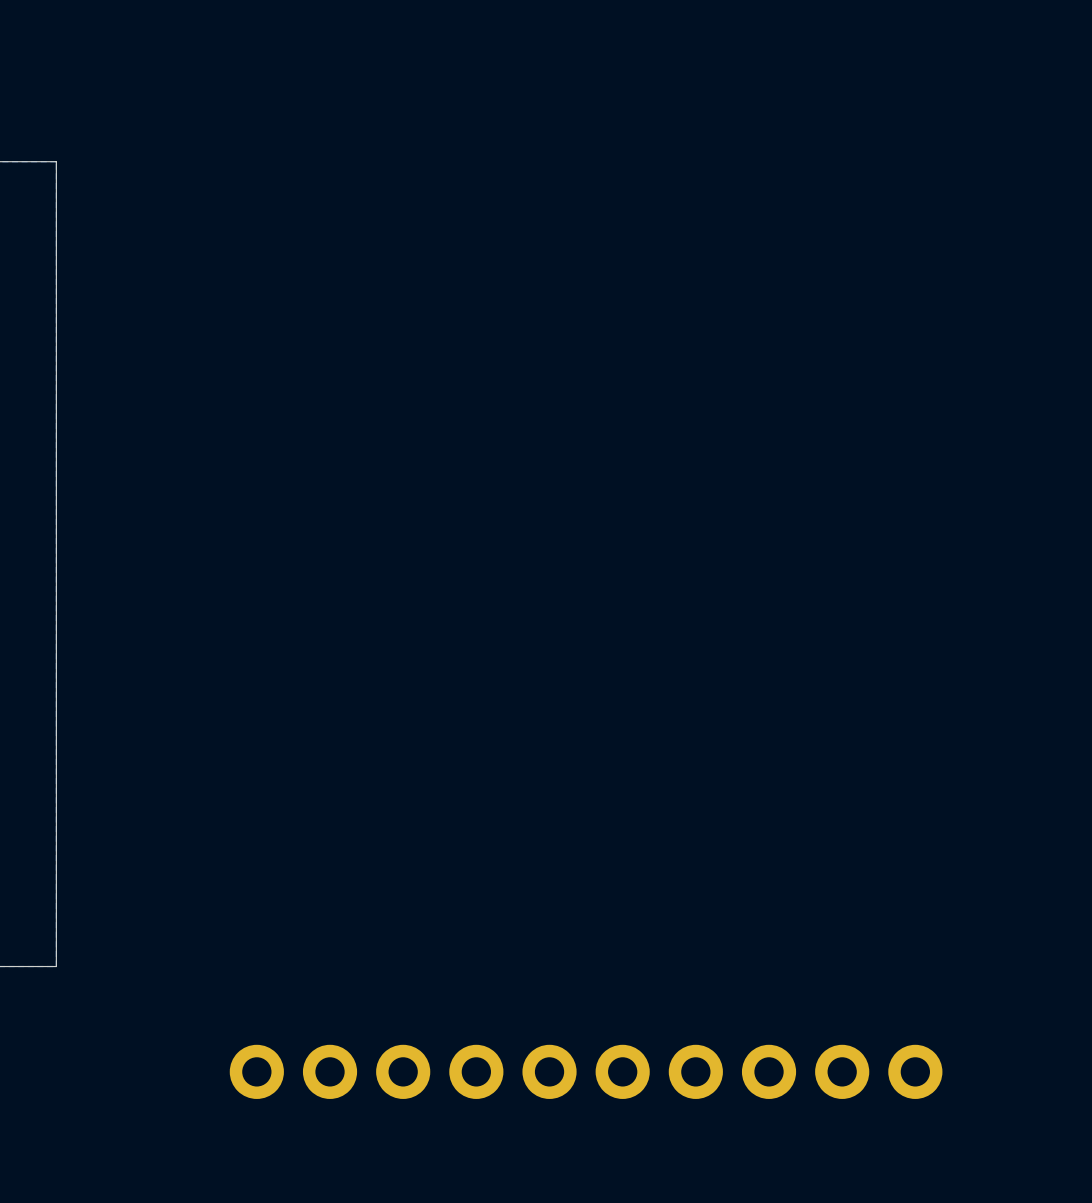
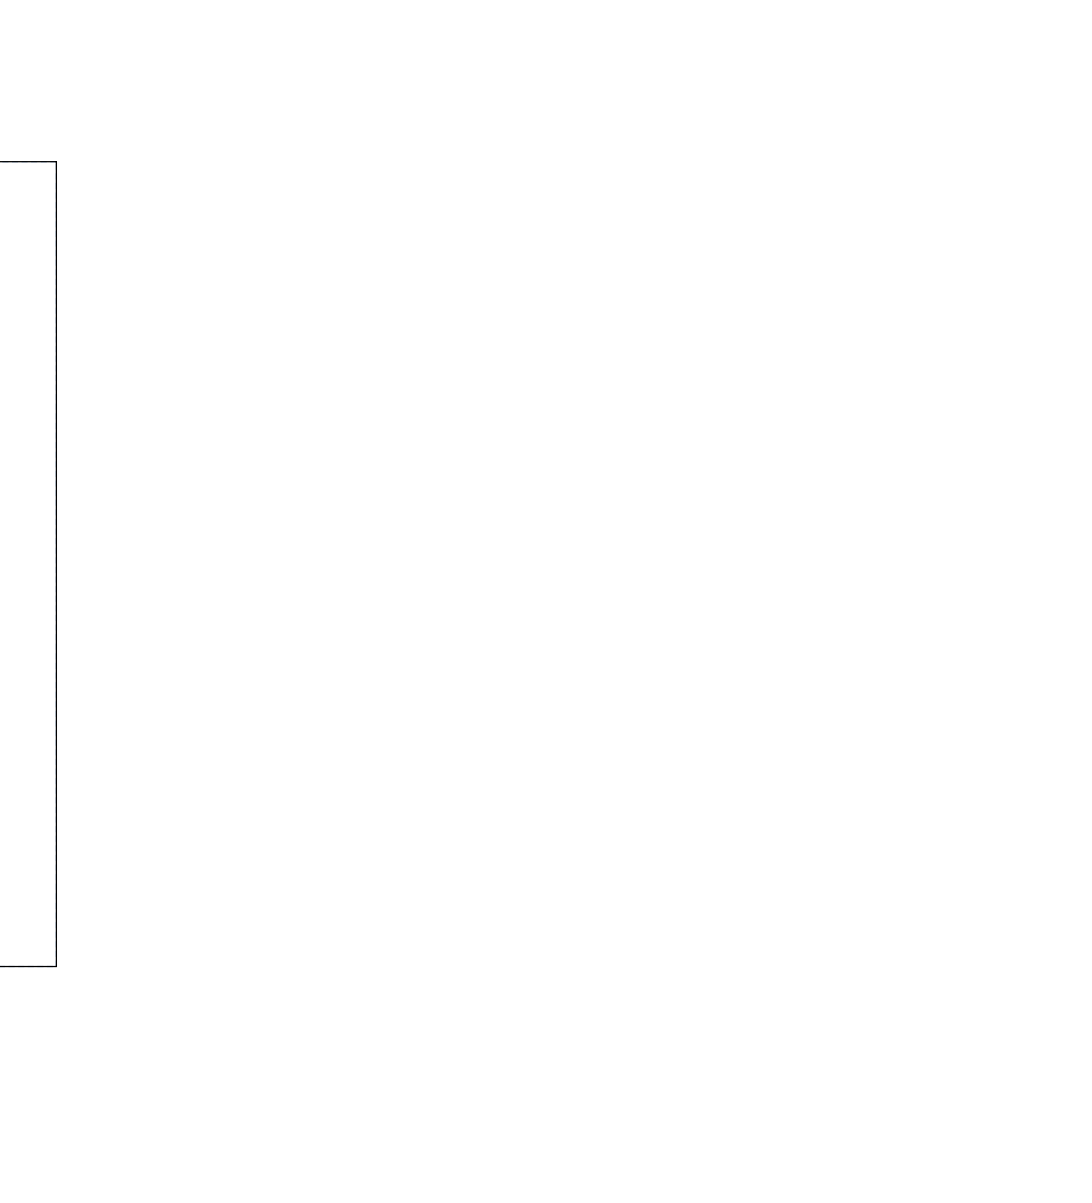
part: (586, 1071) -> none

